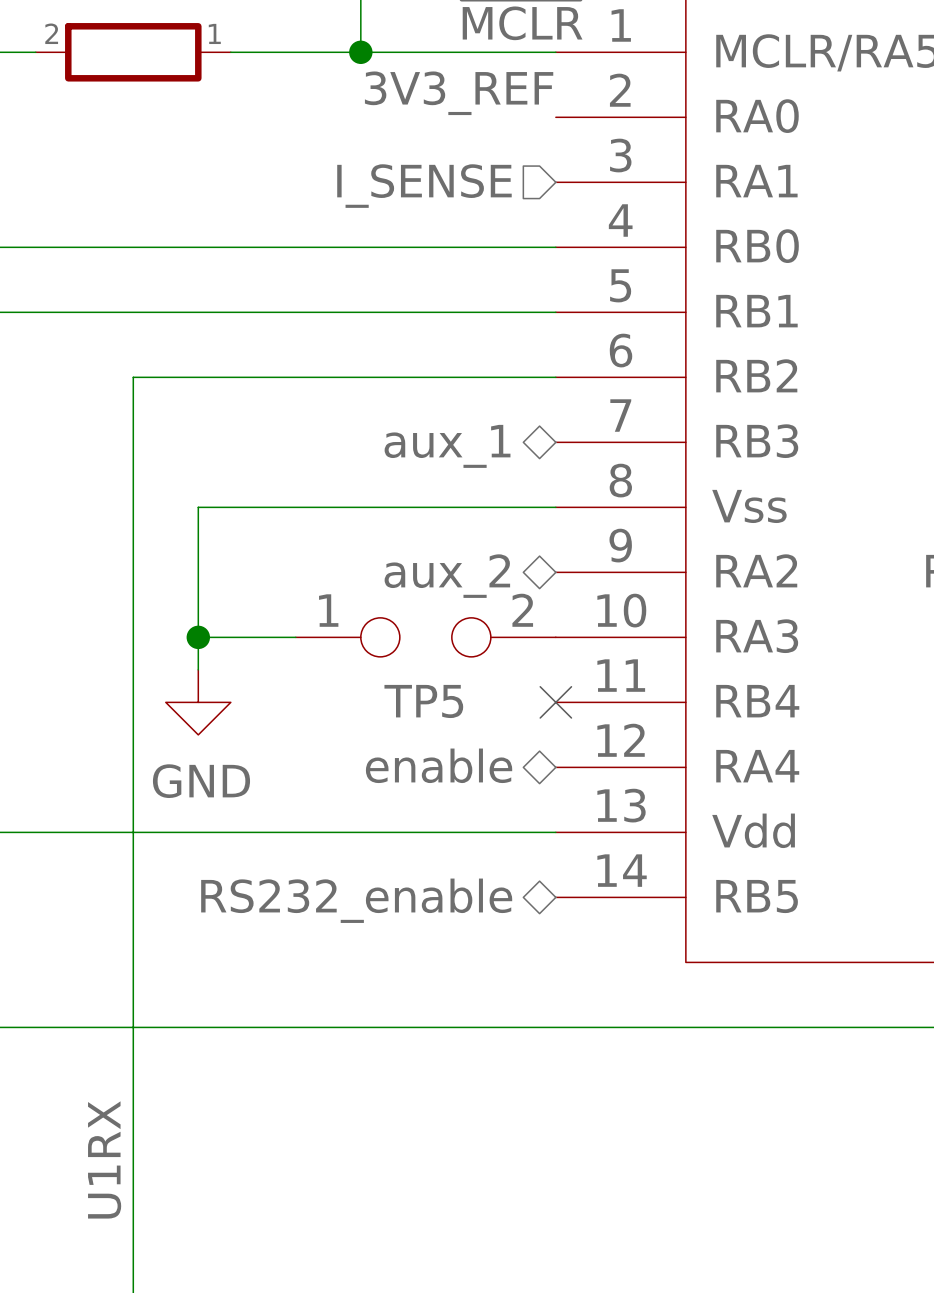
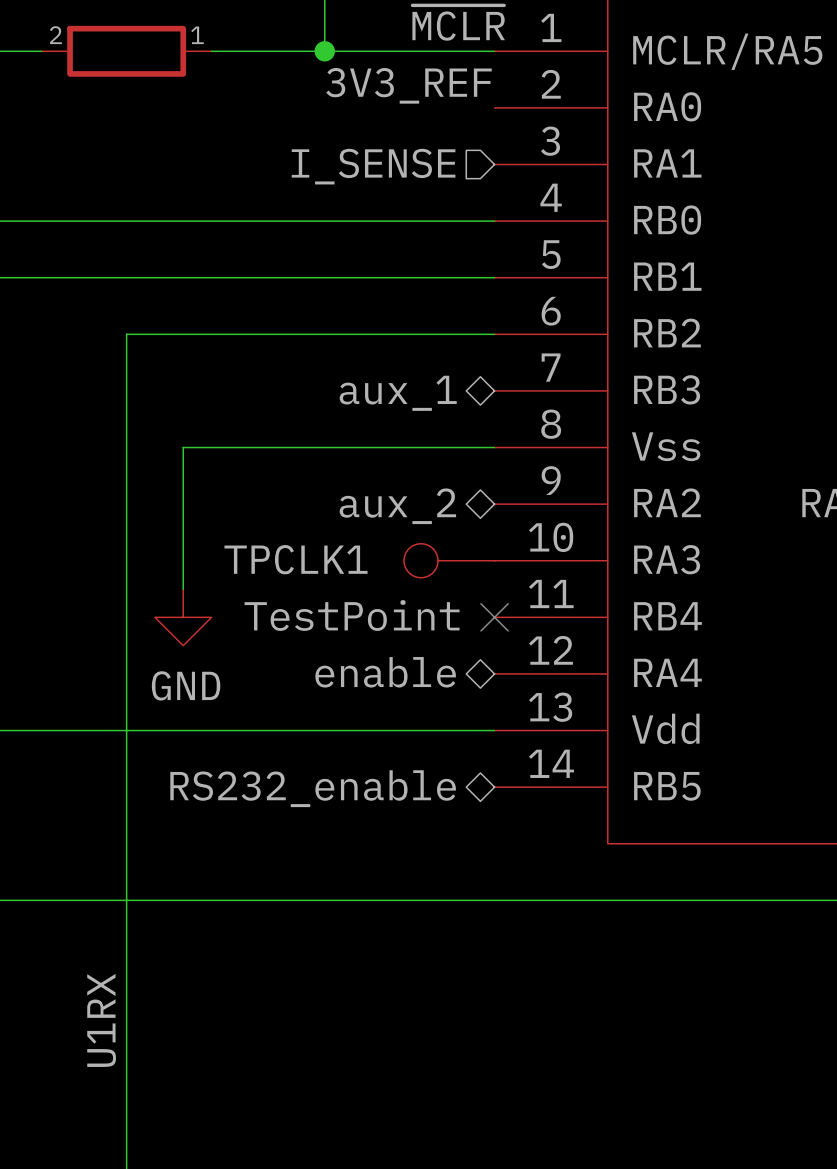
wire: (198, 637) (295, 637) -> none
junction: (198, 637) -> none
TP5: (425, 637) -> none
TPCLK1: none -> TestPoint (449, 560)

